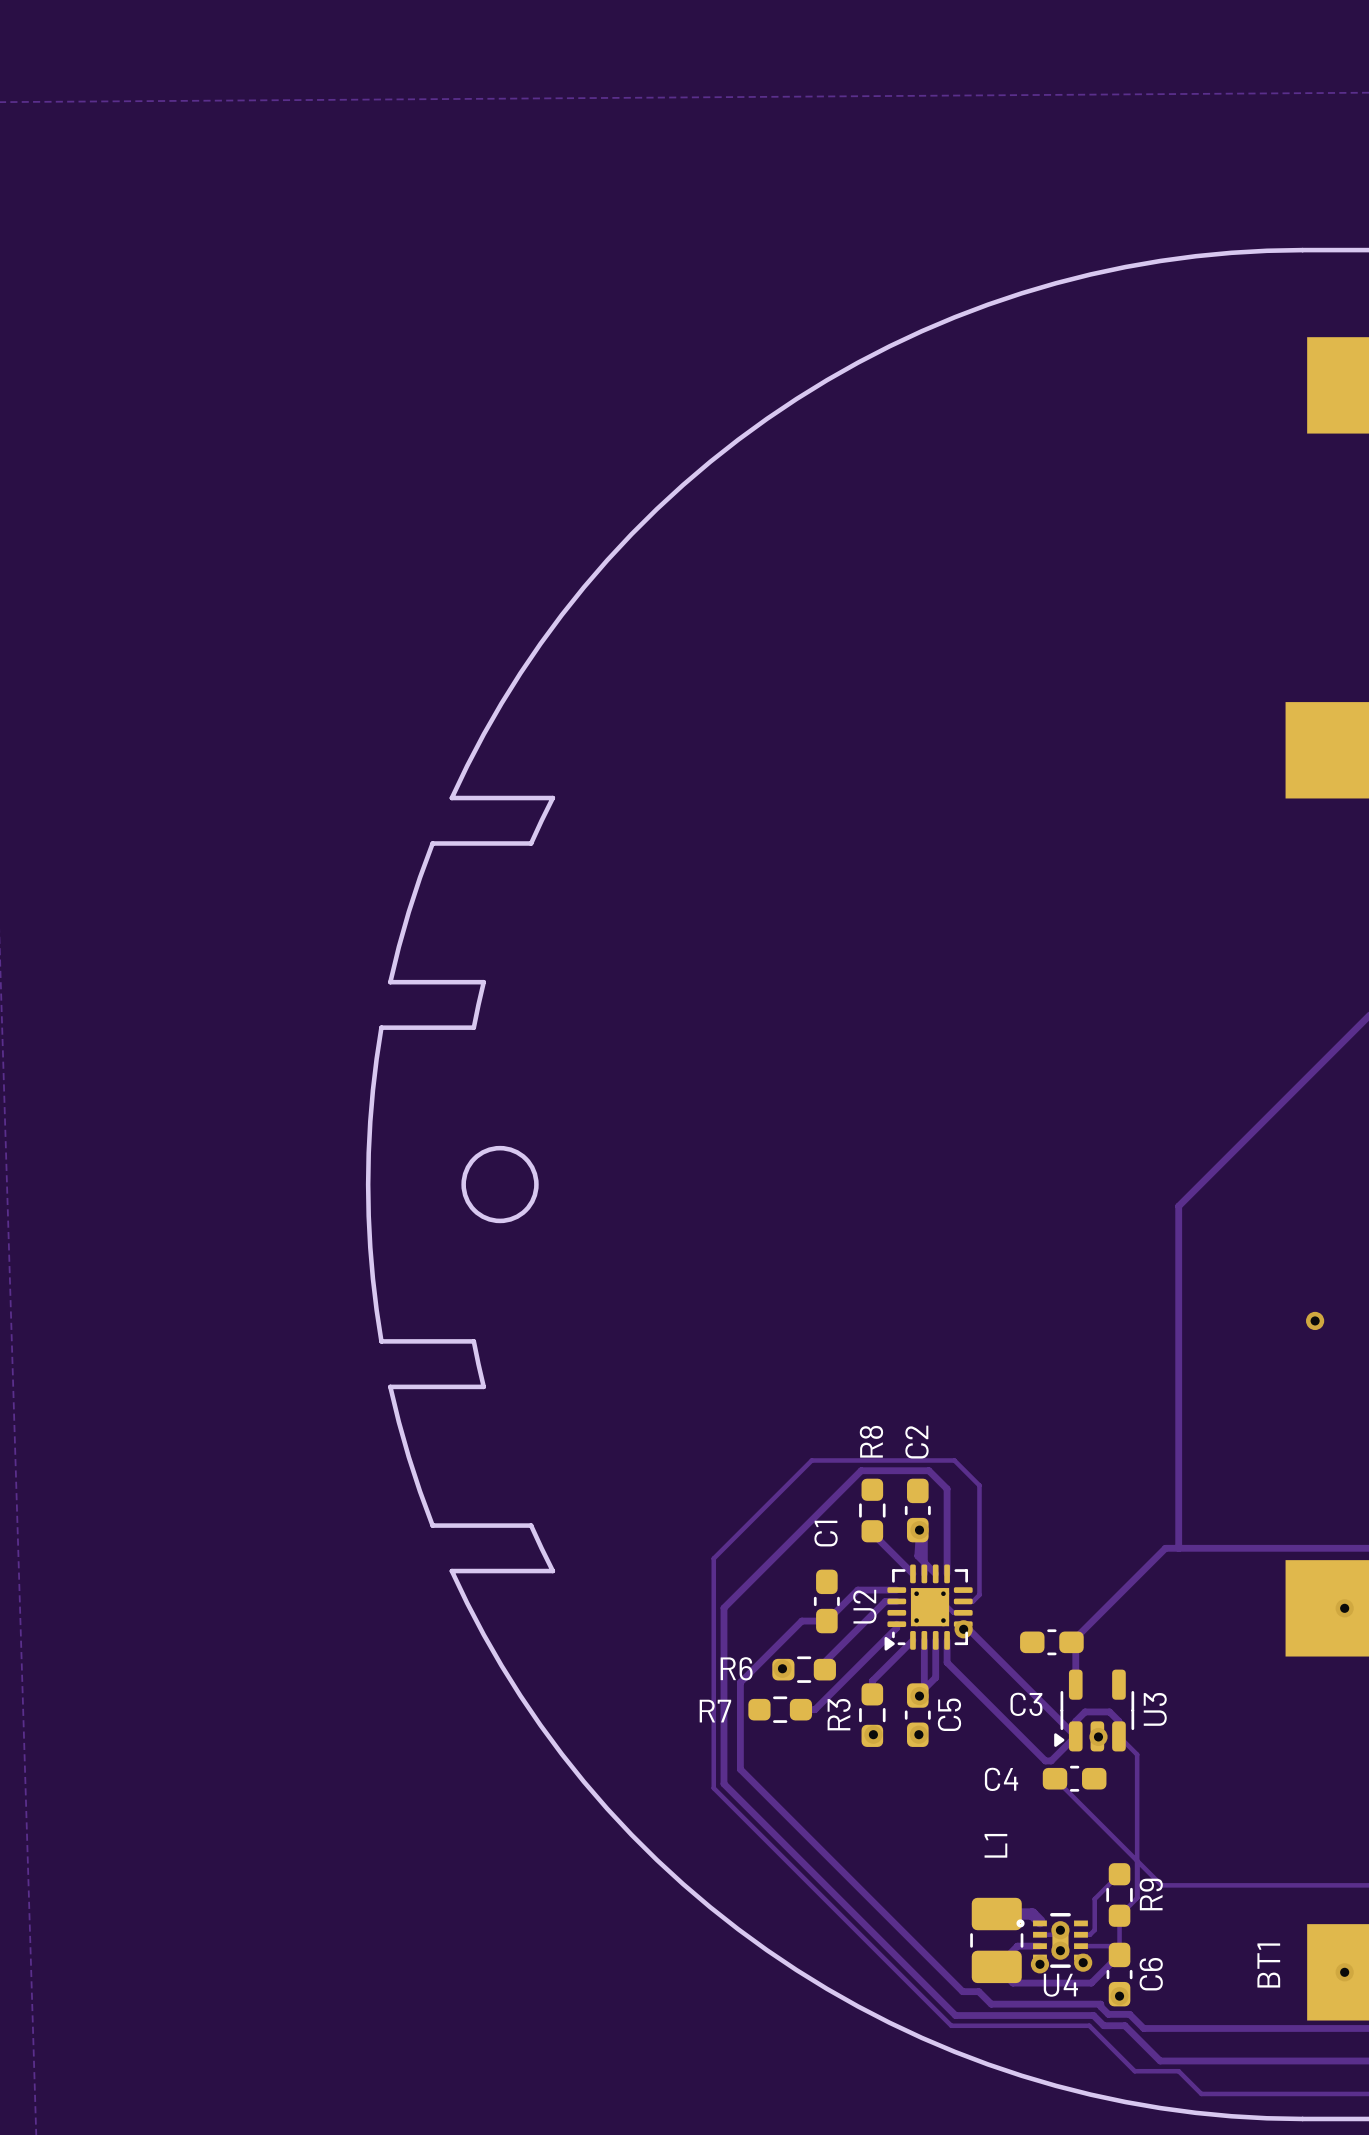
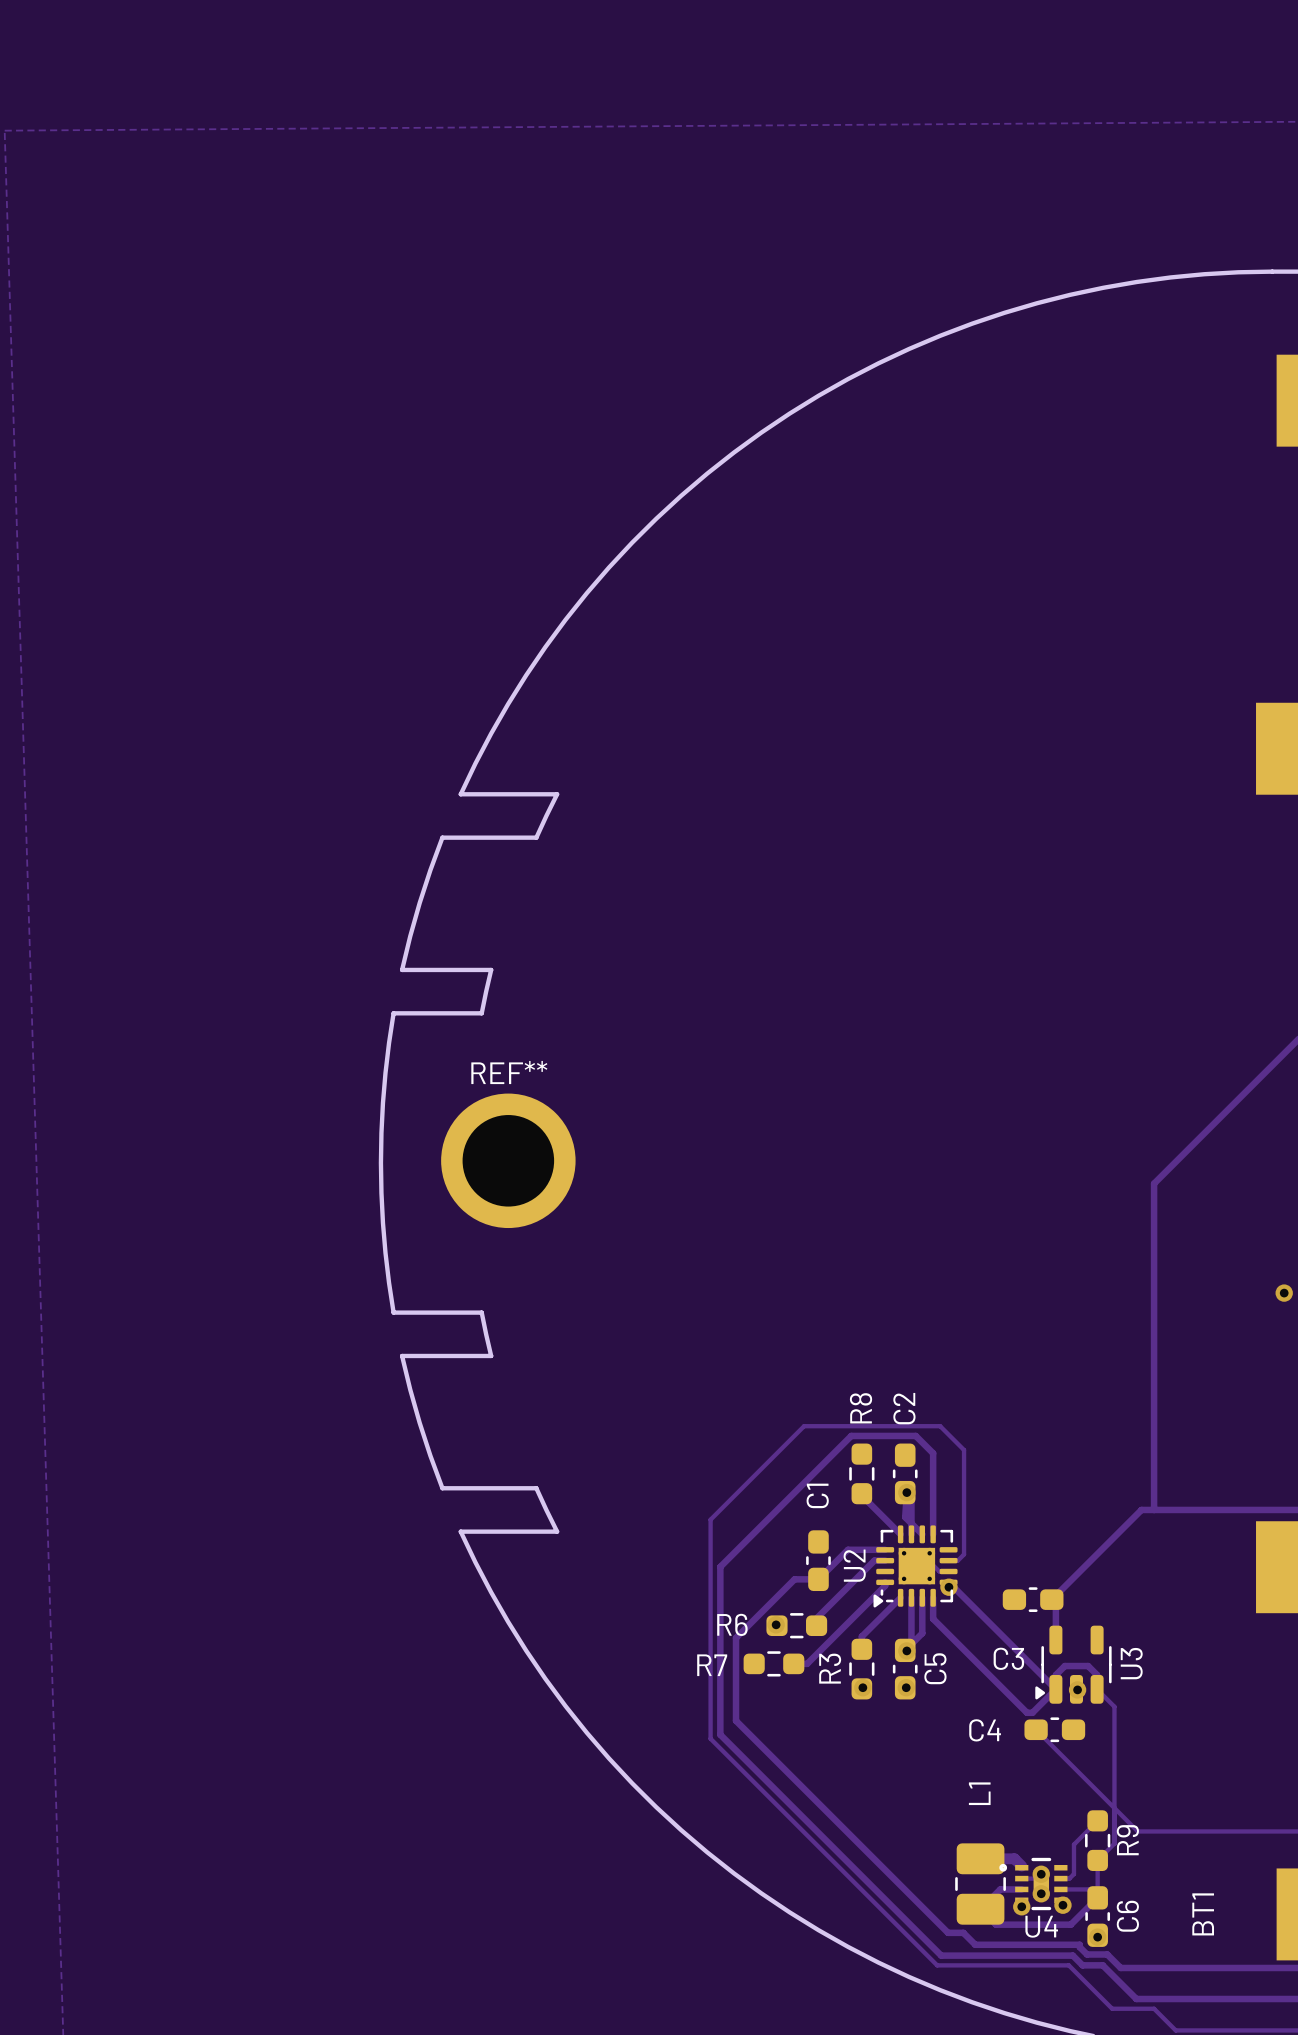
round board edge: [461, 1145, 539, 1224] -> none
REF**: none -> (508, 1160)
BT1 name position: BT1 (1268, 1965) -> BT1 (1203, 1914)

